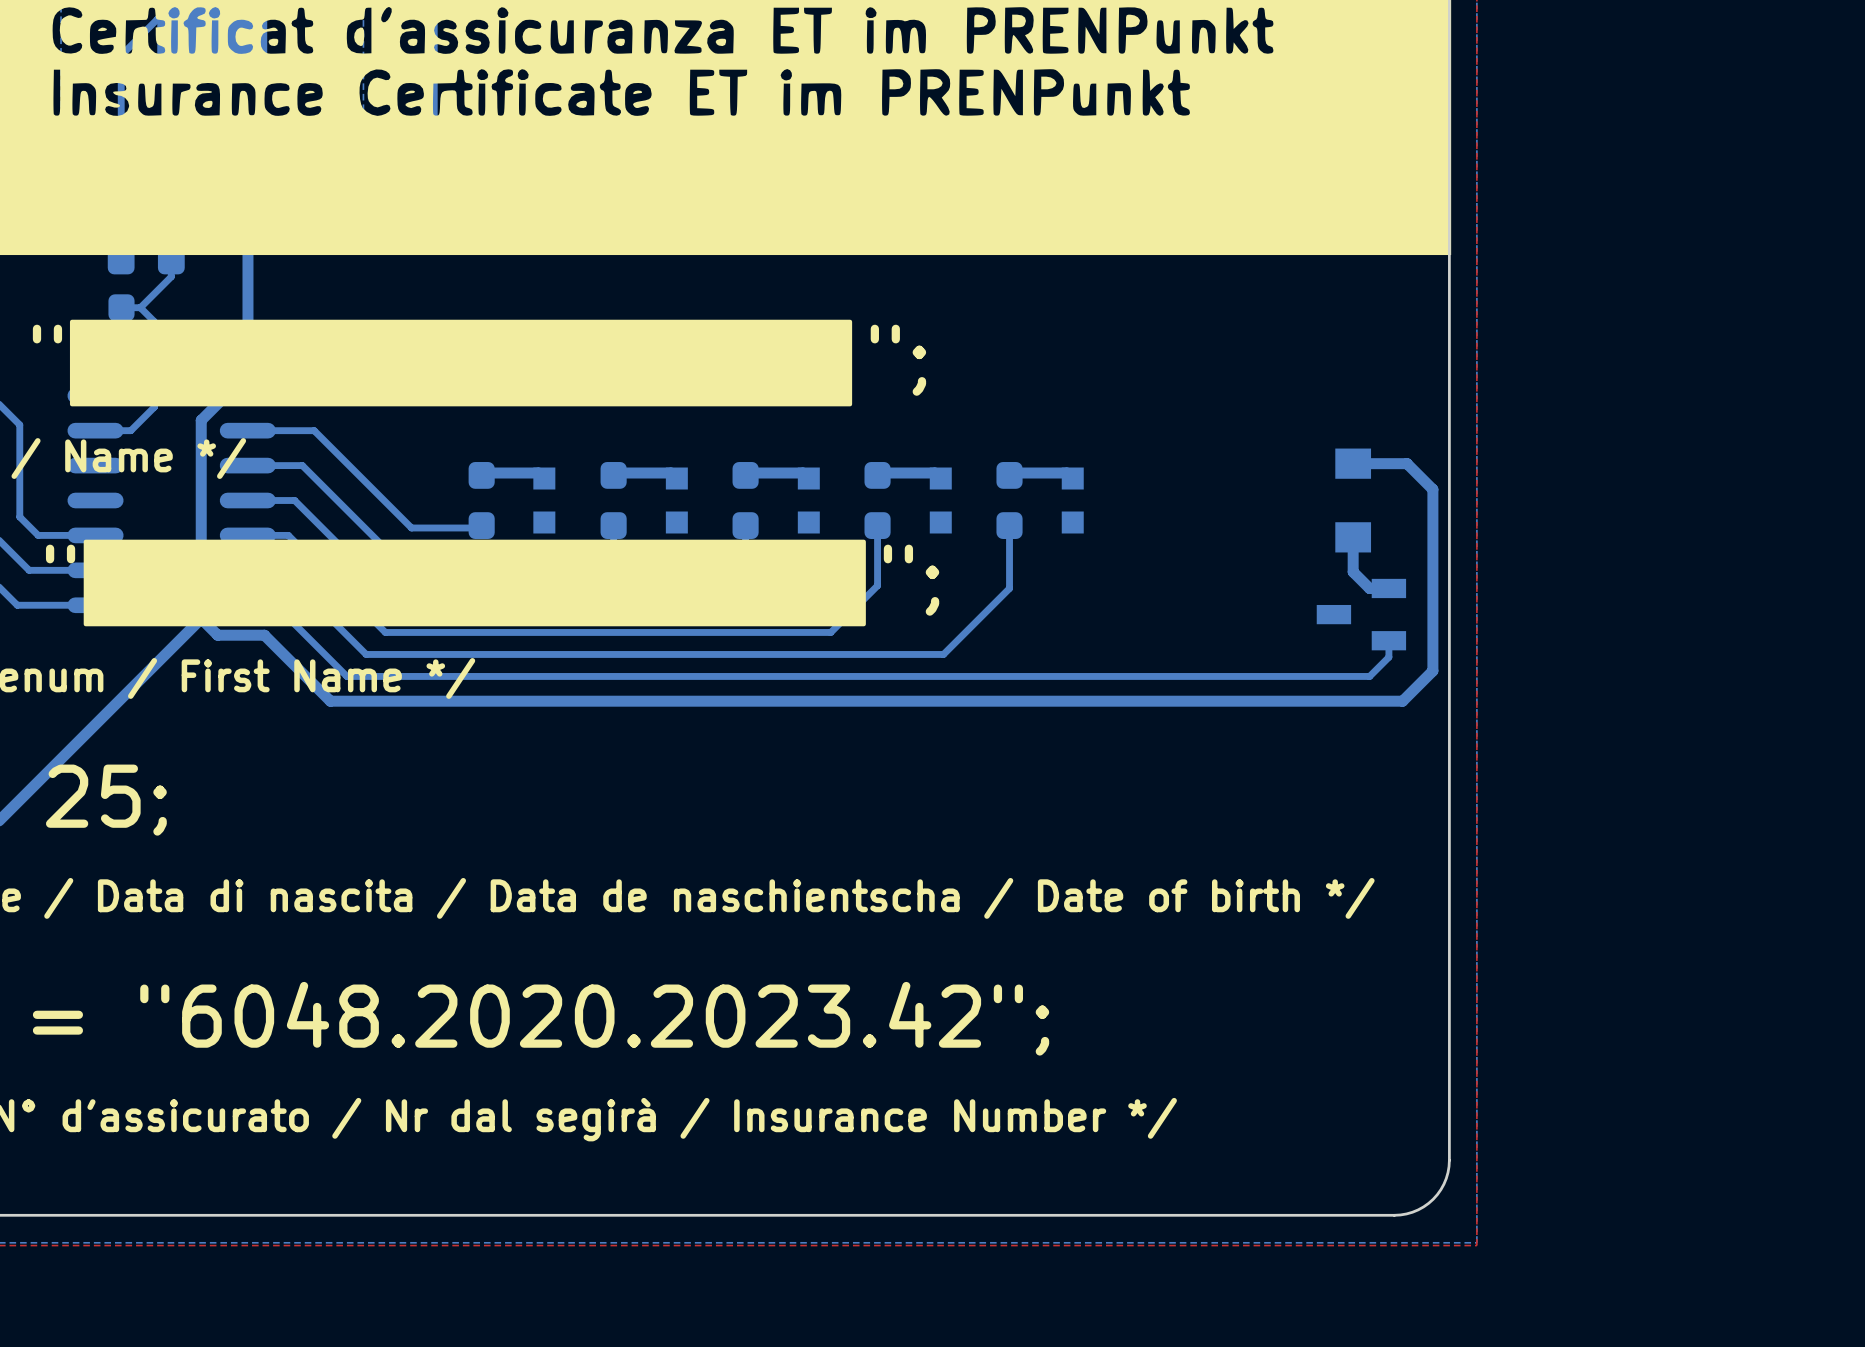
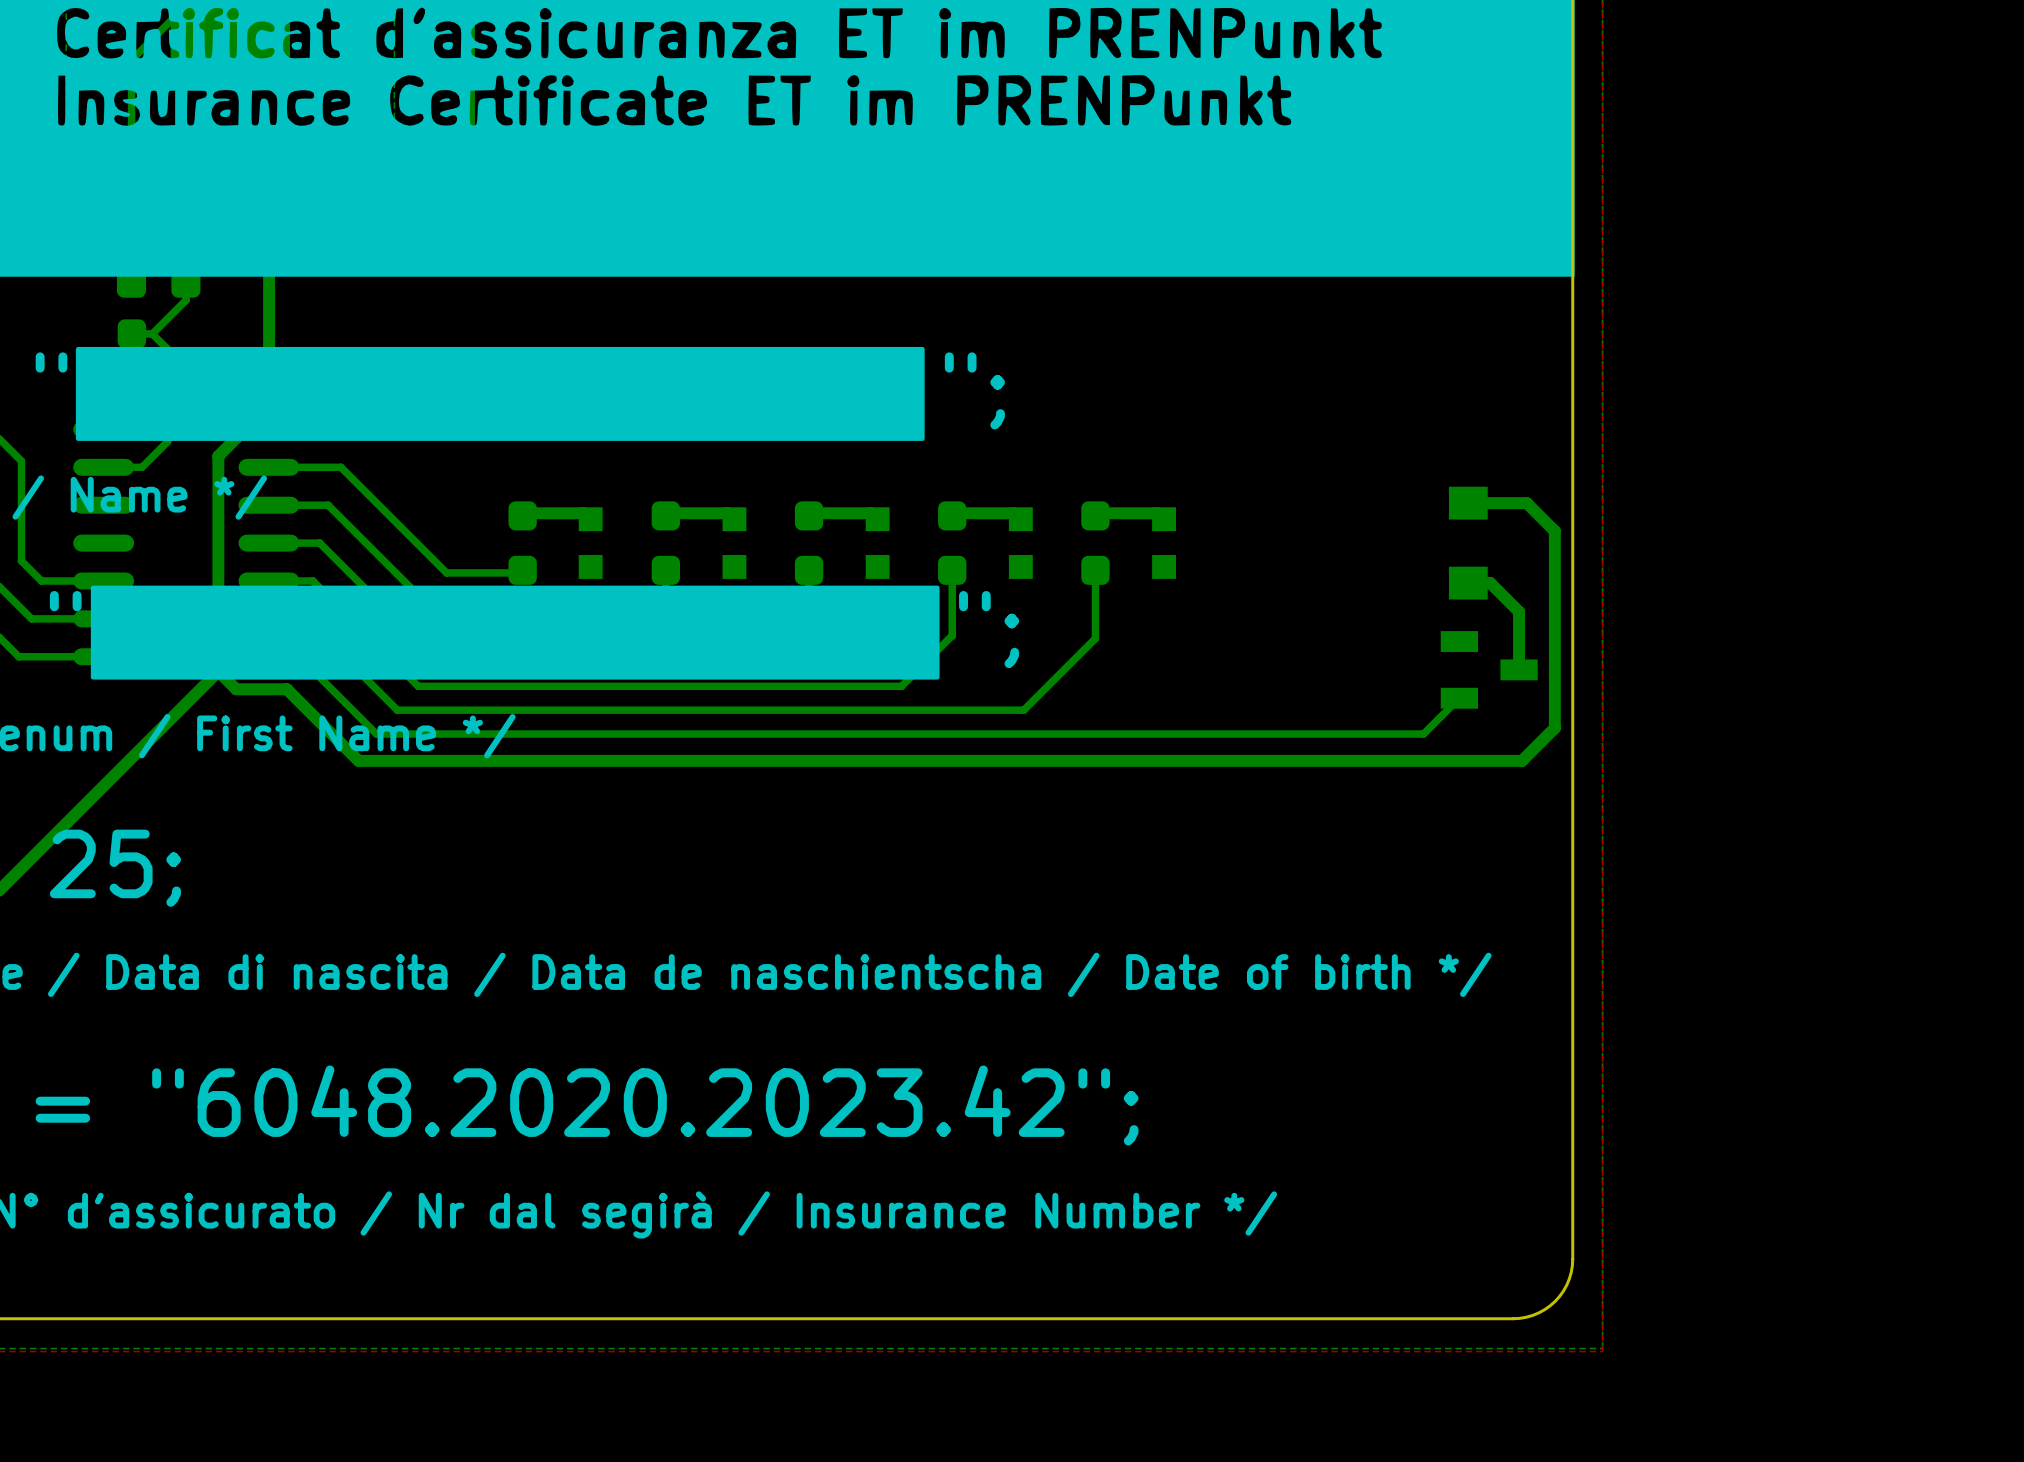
bottom track: (1353, 537) (1353, 571) (1369, 588) (1388, 588) -> (1468, 583) (1490, 583) (1519, 611) (1519, 669)
part rotation: 0° (1361, 614) -> 180° (1489, 669)
bottom track: (1388, 640) (1388, 657) (1369, 676) (1311, 676) -> (1459, 698) (1423, 734)

